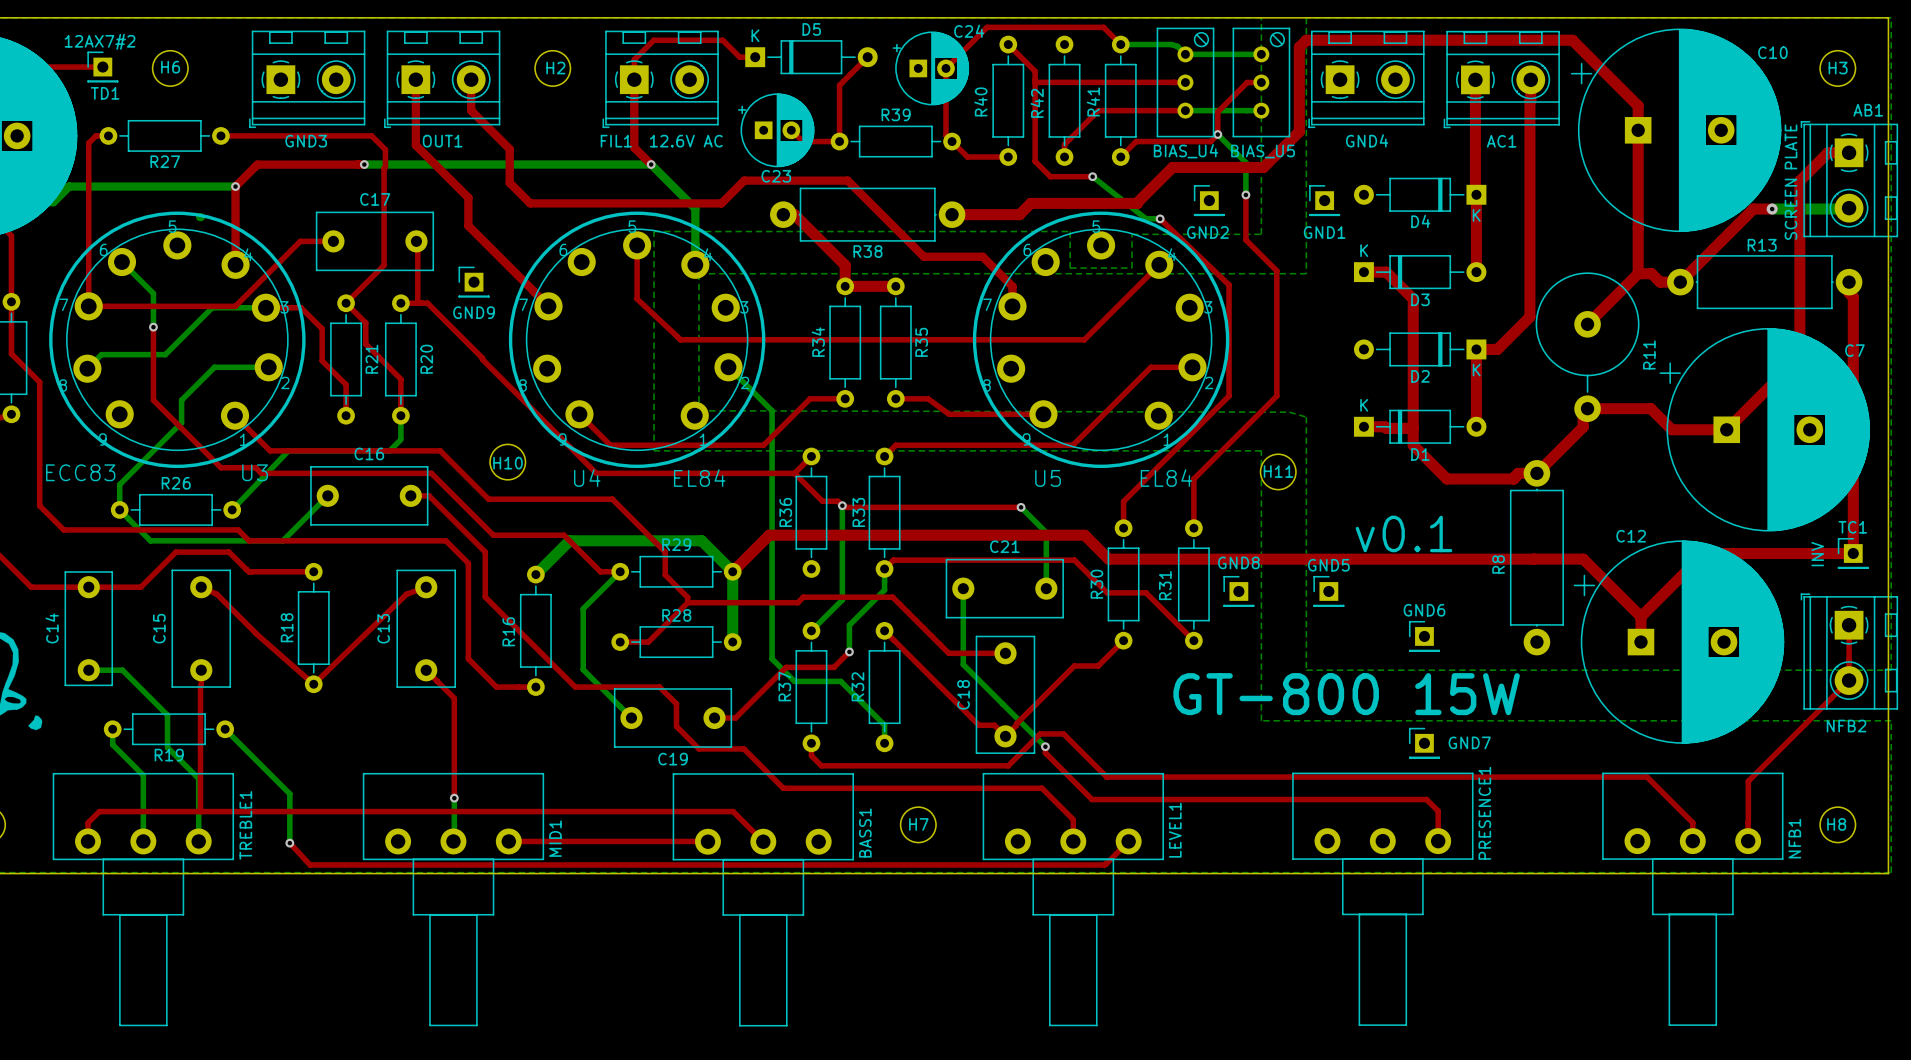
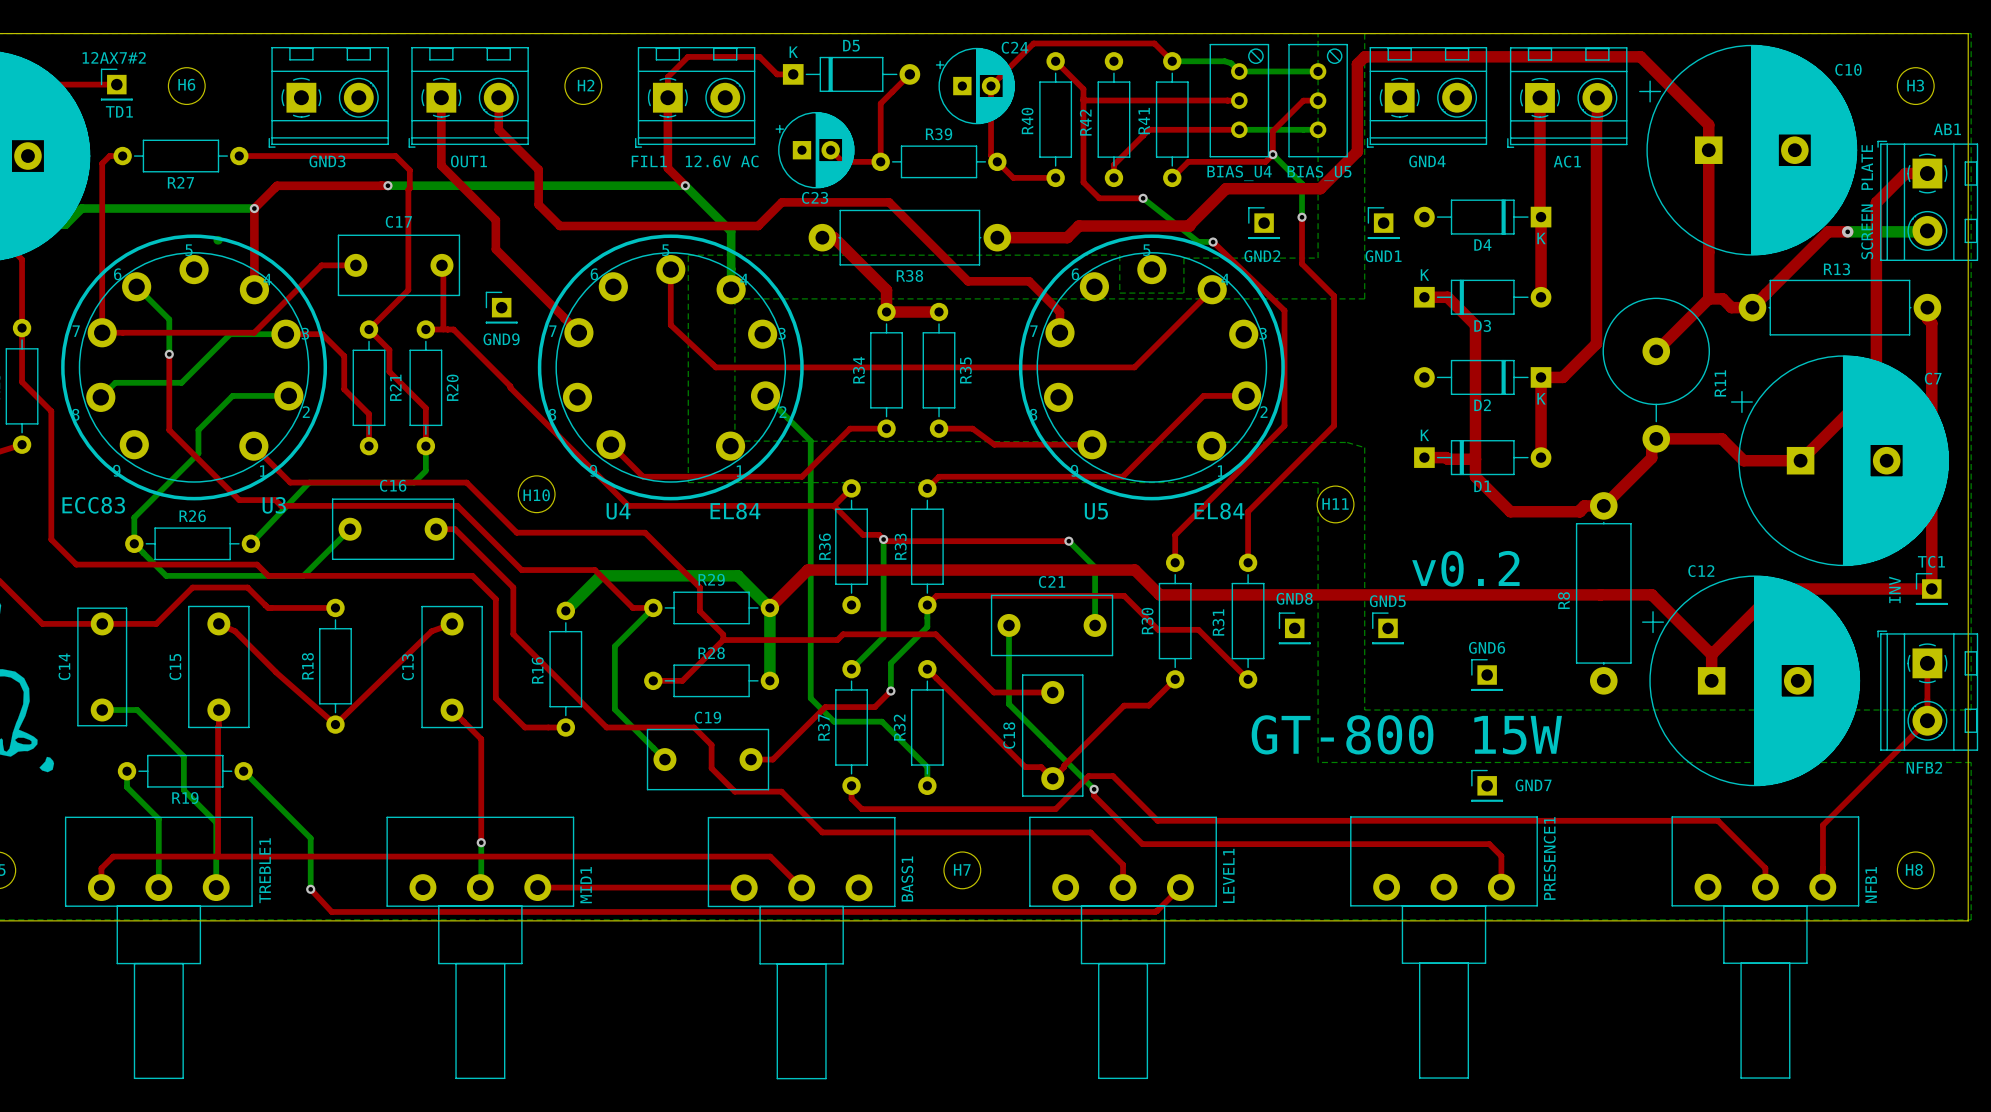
text: v0.1 (1403, 533) -> v0.2 (1465, 568)
C19 name position: C19 (673, 759) -> C19 (707, 717)

